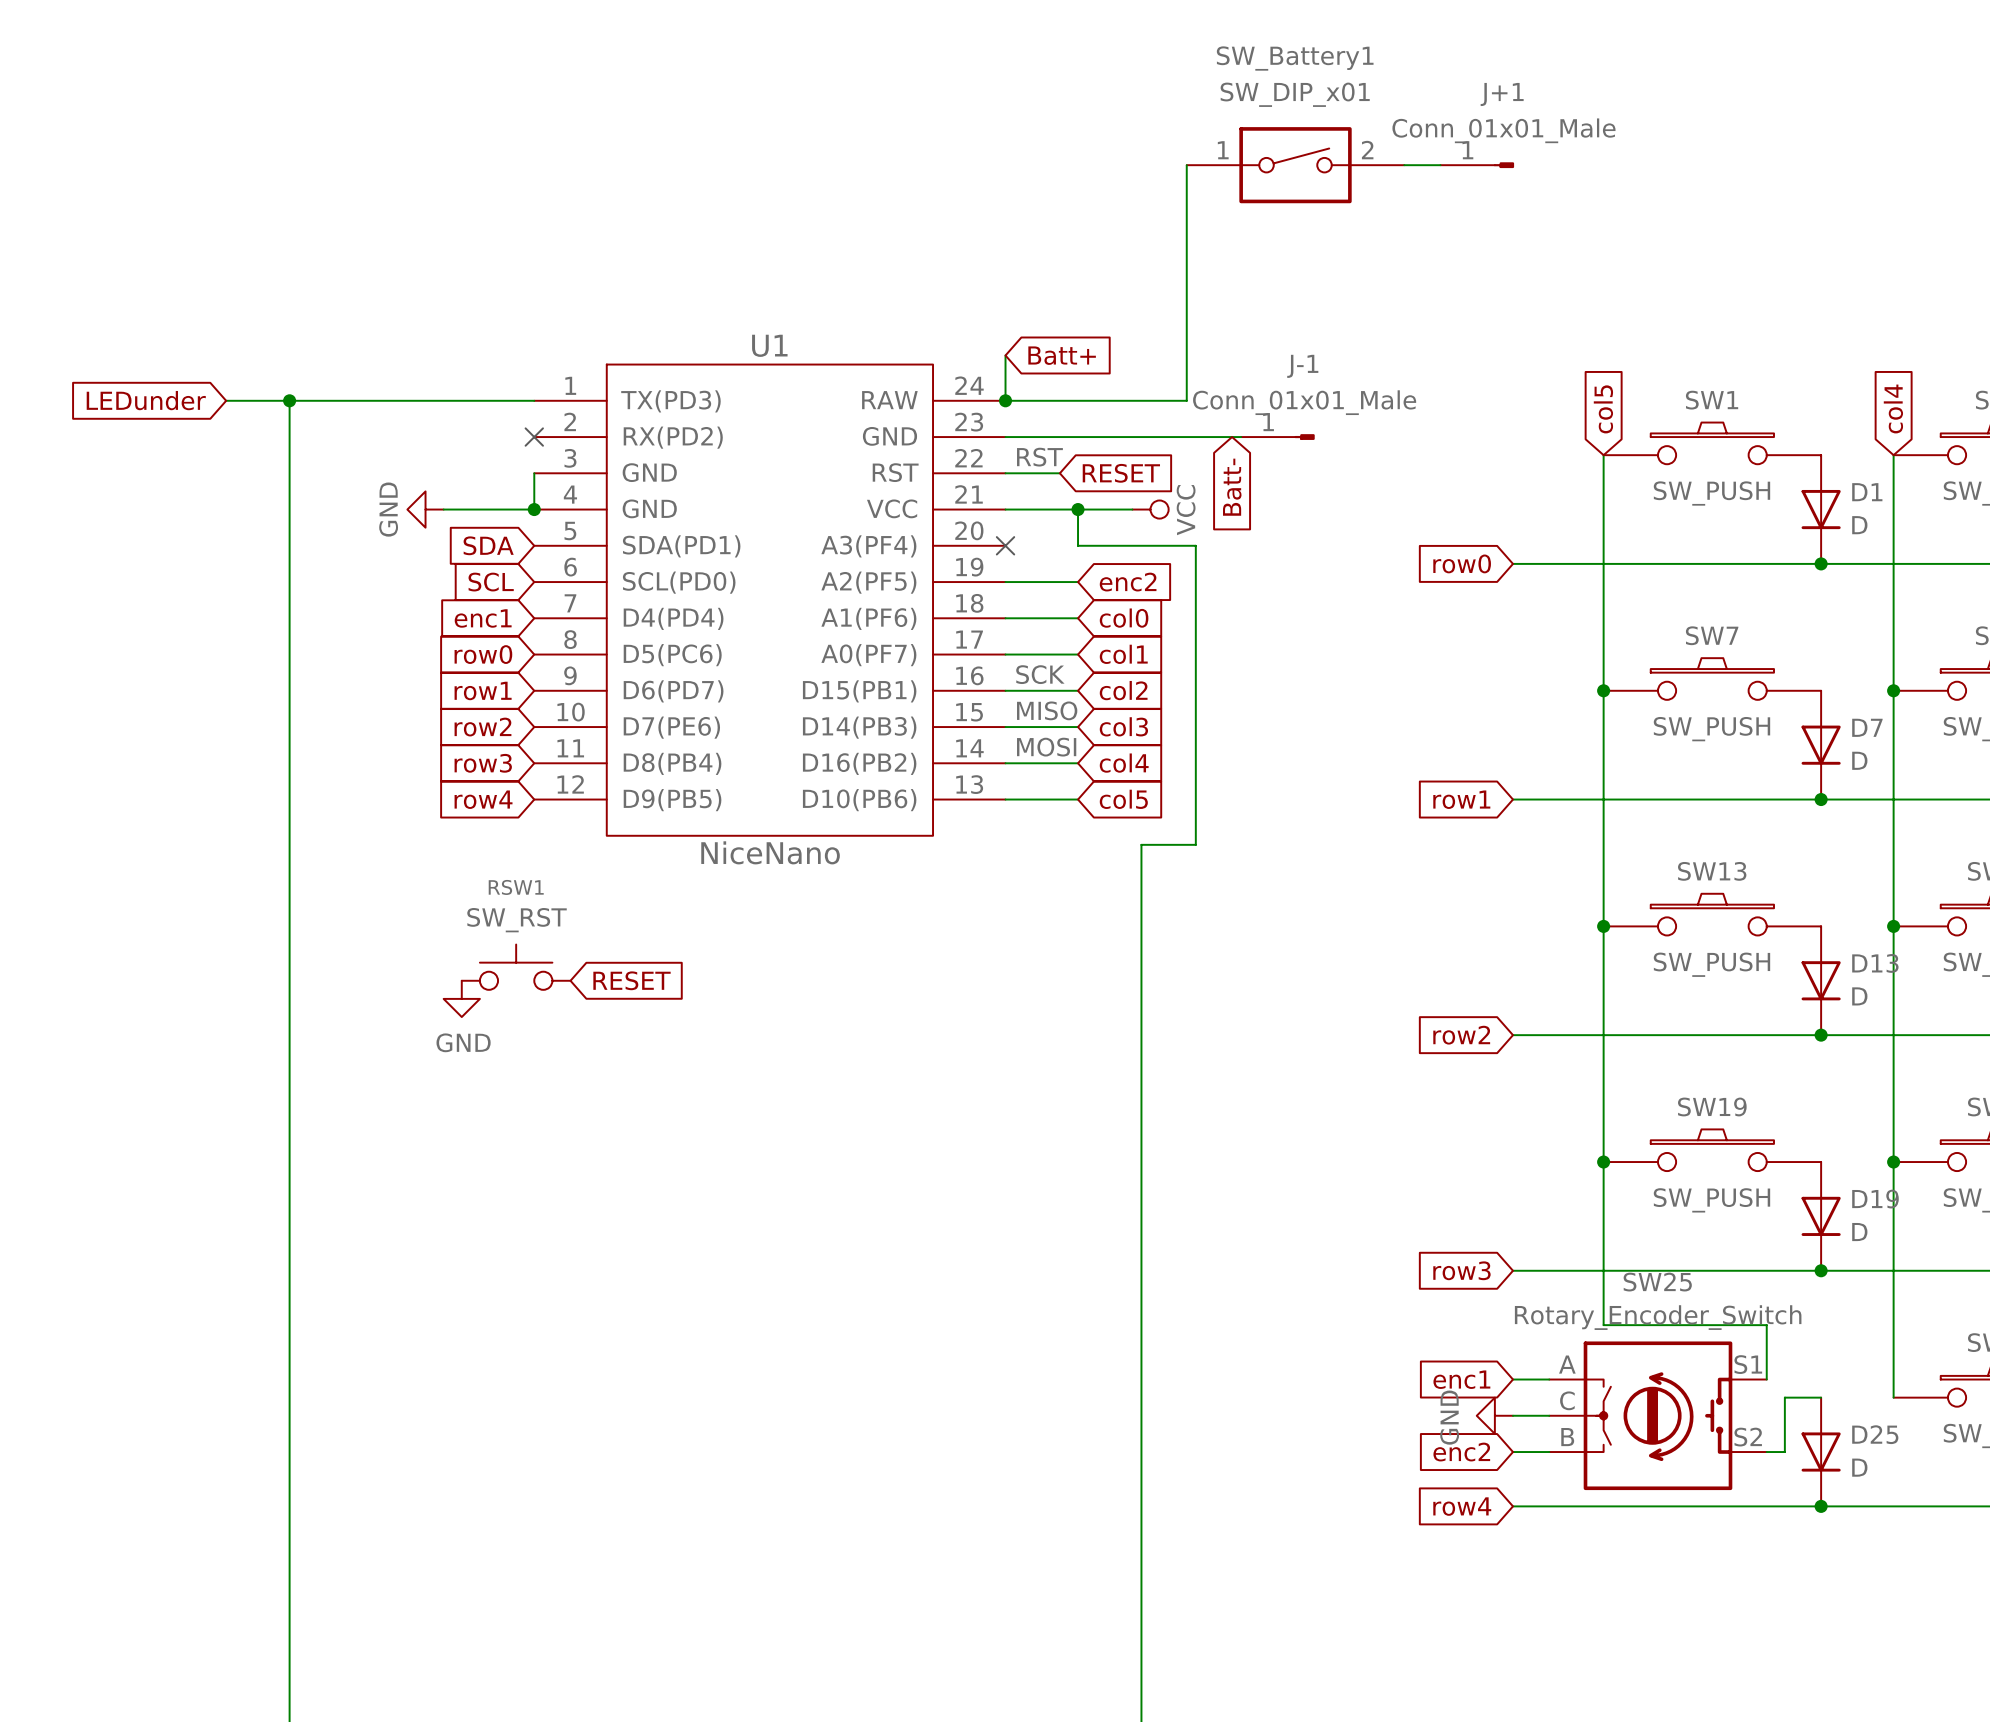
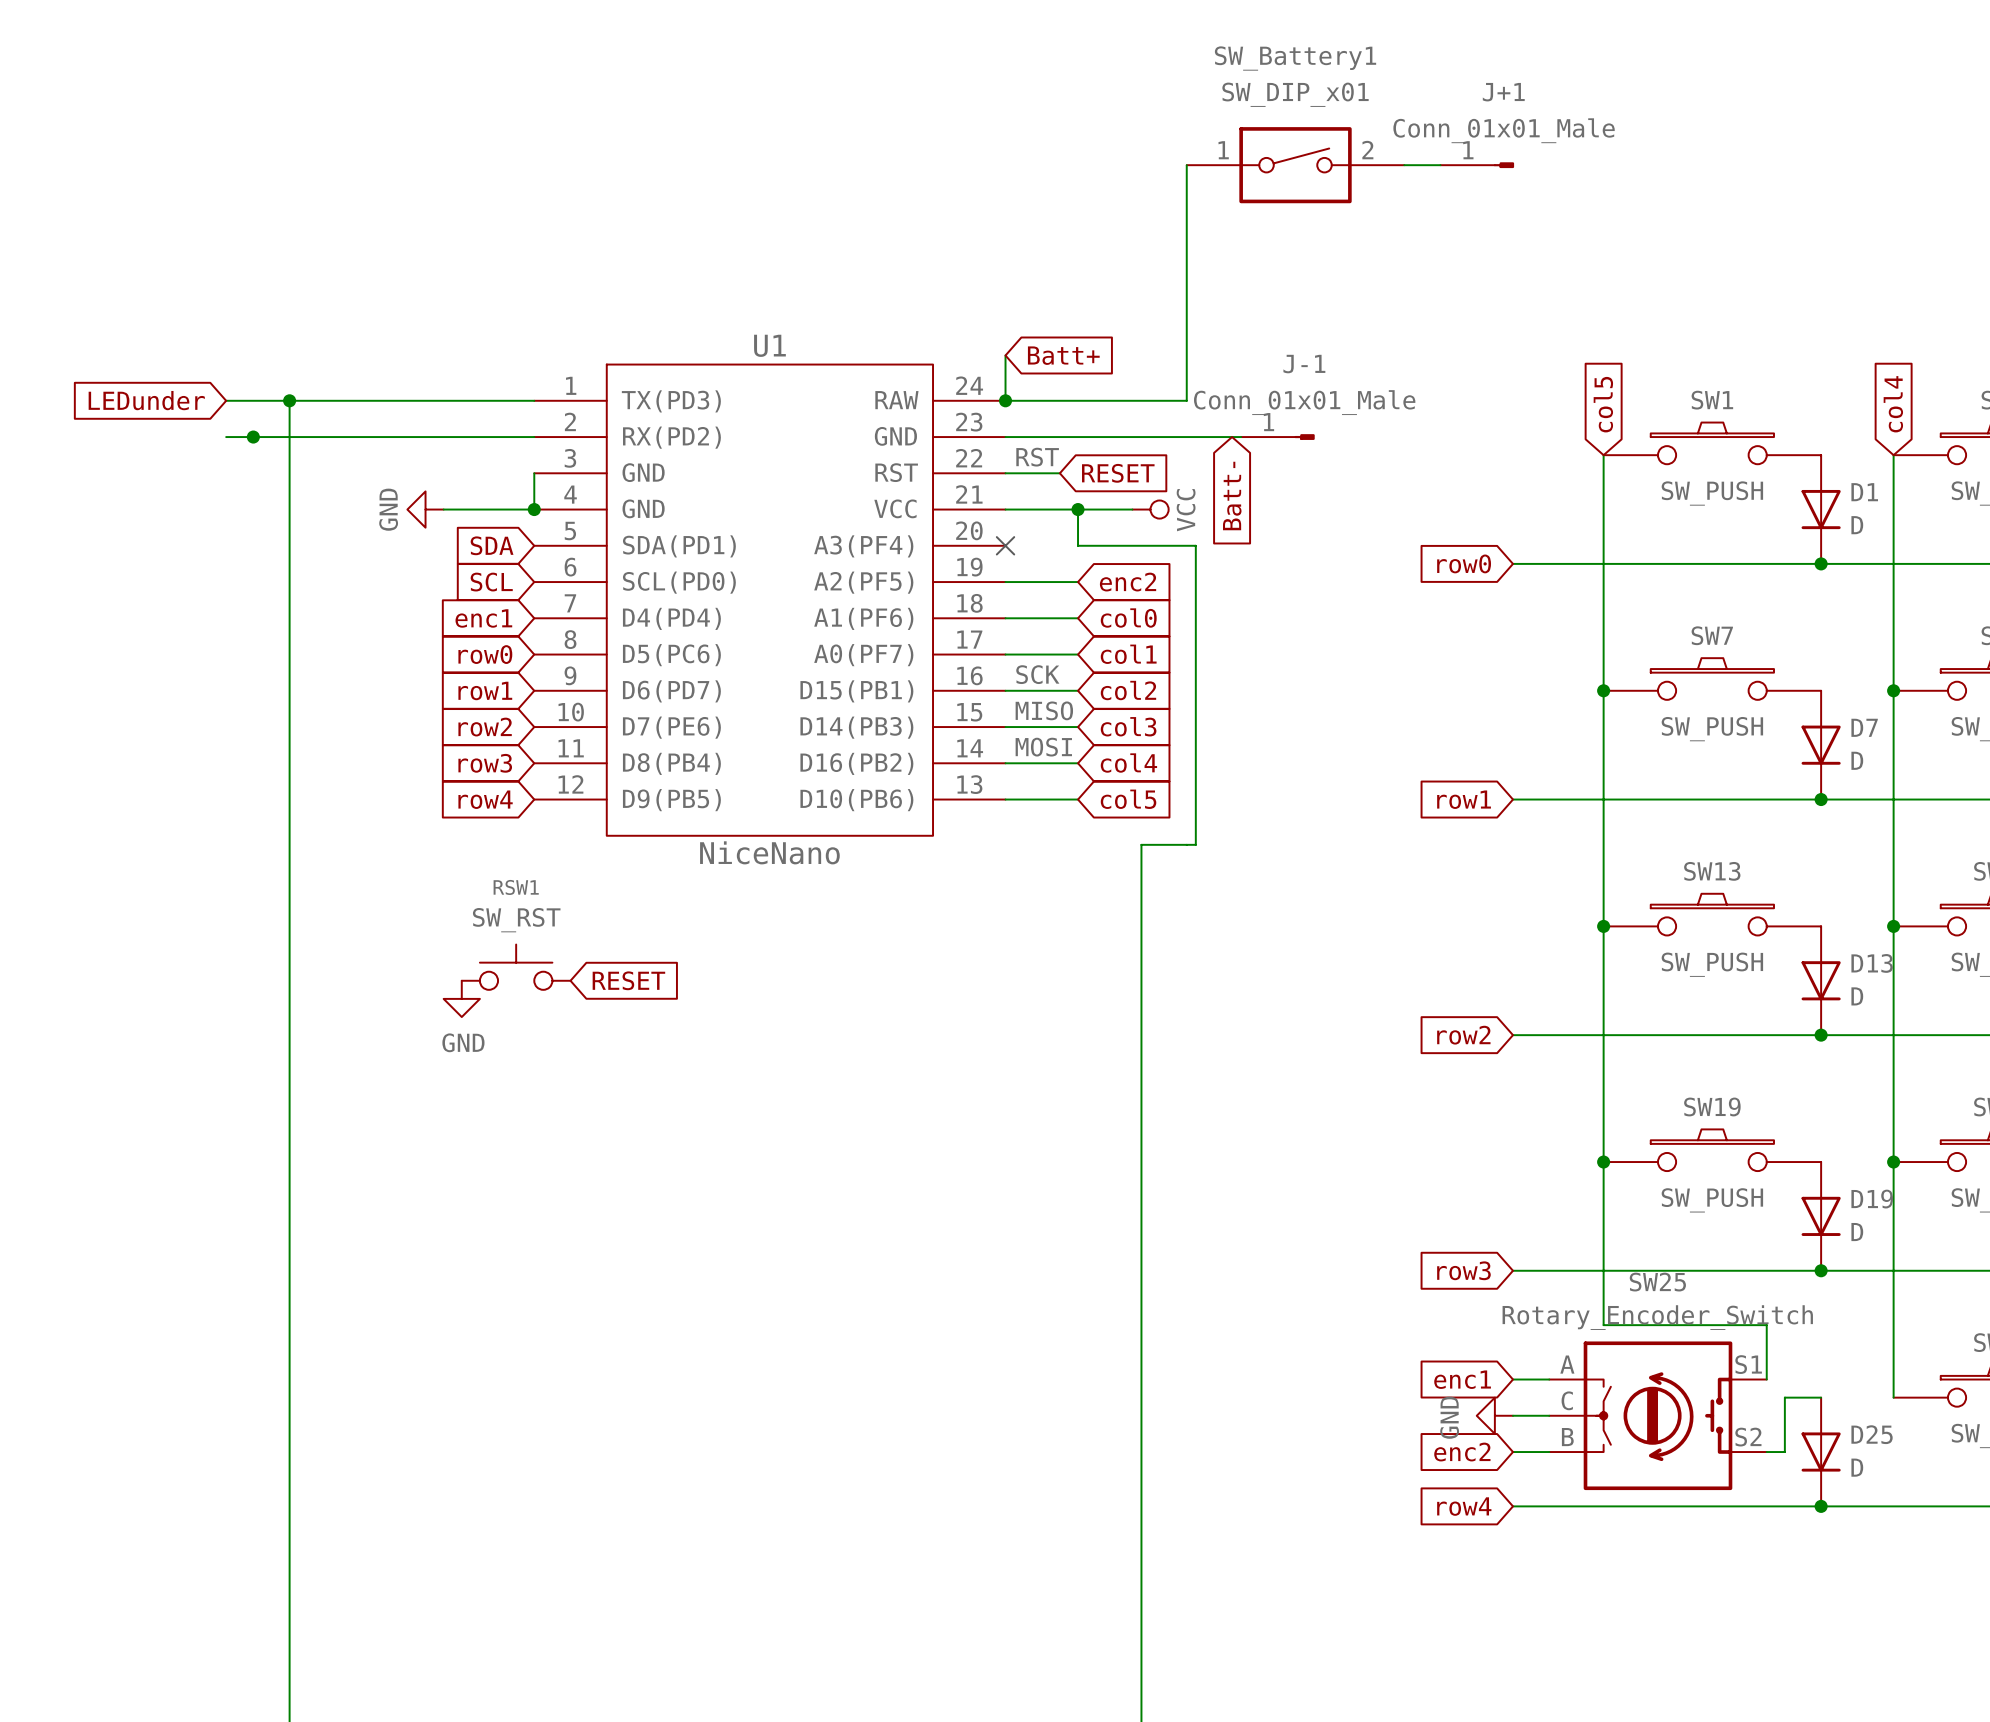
wire: none -> (226, 437) (534, 437)
junction: none -> (253, 437)
no-connect mark: (534, 437) -> none

